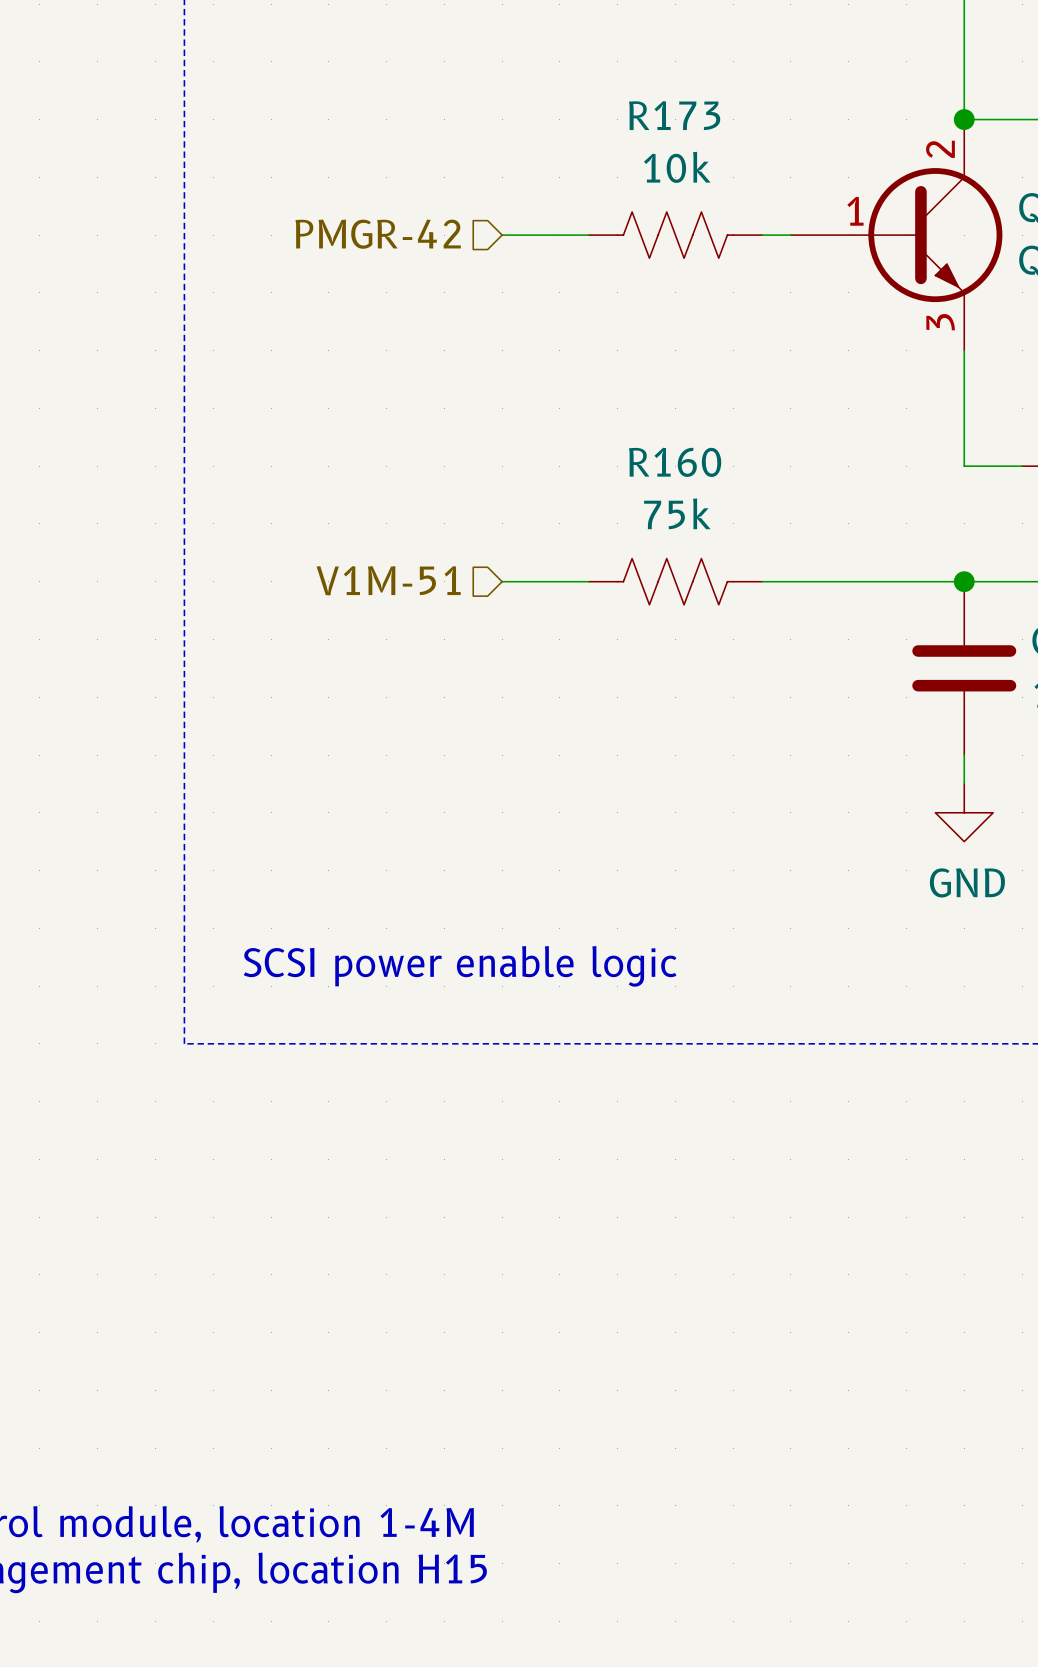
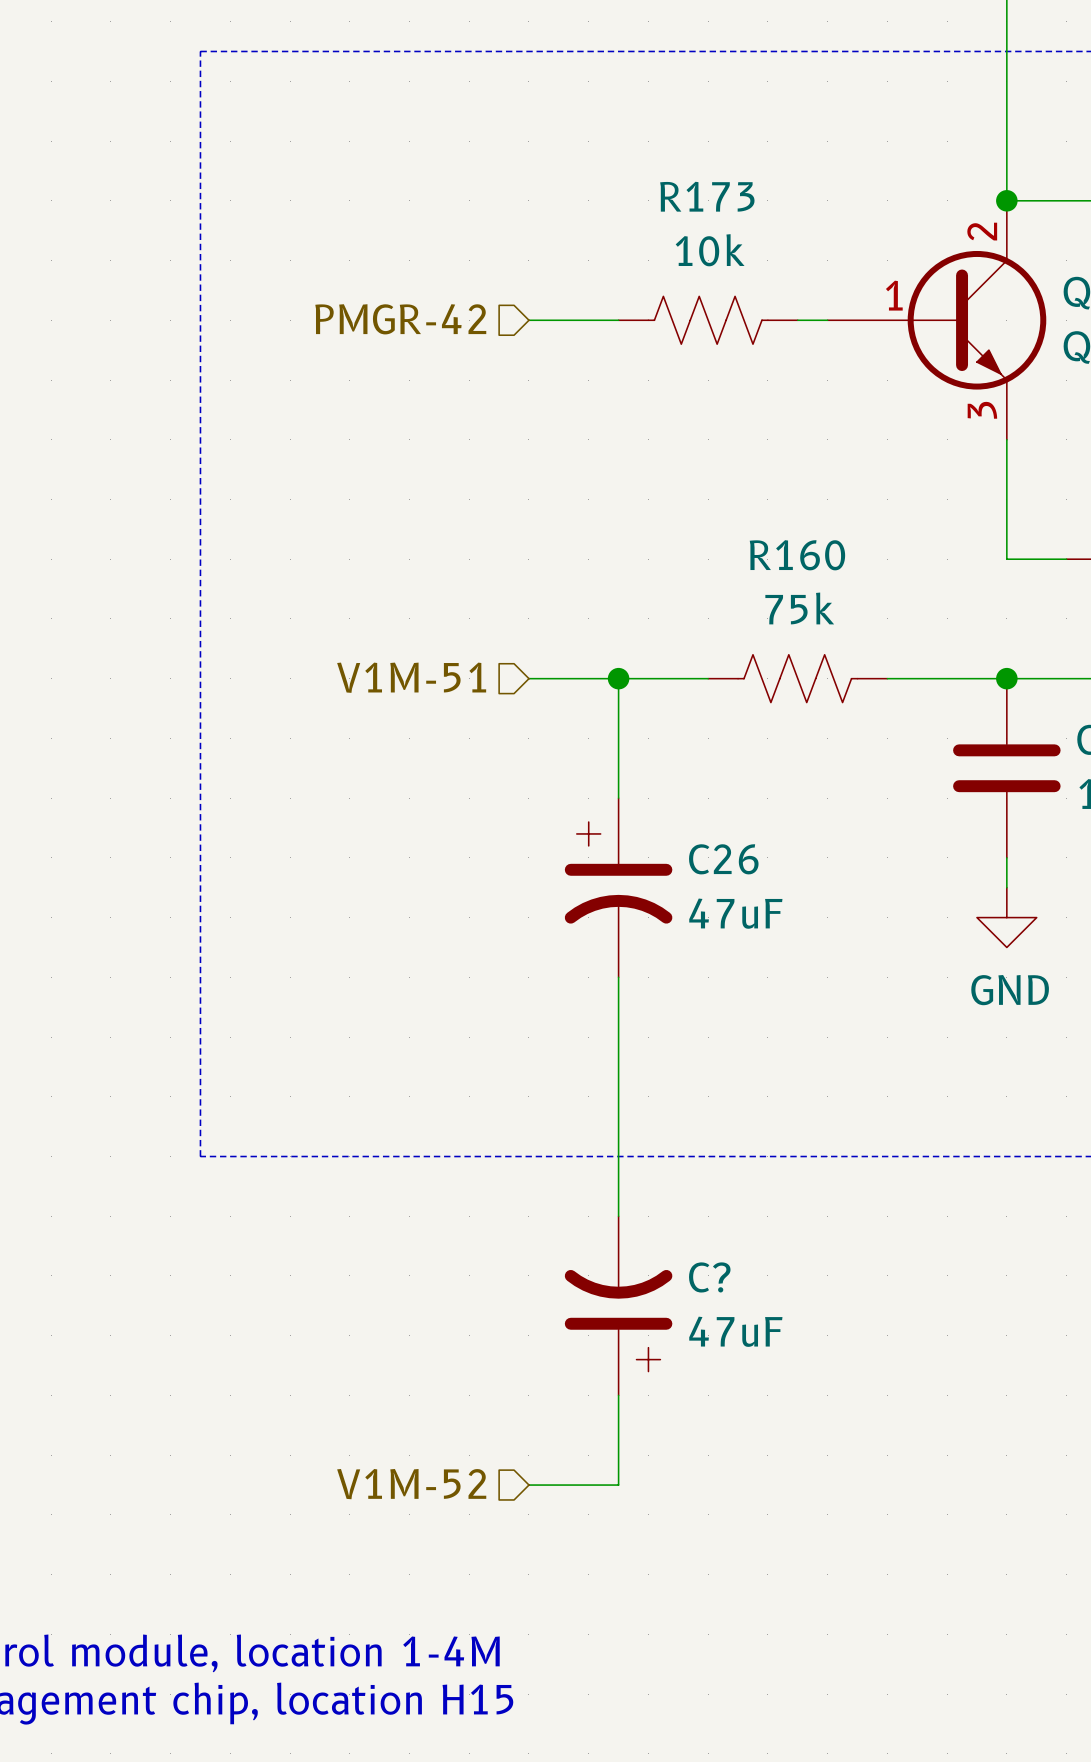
junction: none -> (618, 678)
wire: none -> (708, 678) (618, 678) (618, 798)
R160 position: (675, 581) -> (797, 678)
wire: (762, 581) (848, 581) -> none
C26: none -> 47uF (618, 887)
wire: none -> (618, 977) (618, 1216)
text: SCSI power enable logic (460, 966) -> none
C?: none -> 47uF (618, 1305)
wire: none -> (618, 1395) (618, 1485) (528, 1485)
hierarchical label: none -> V1M-52 (411, 1484)

